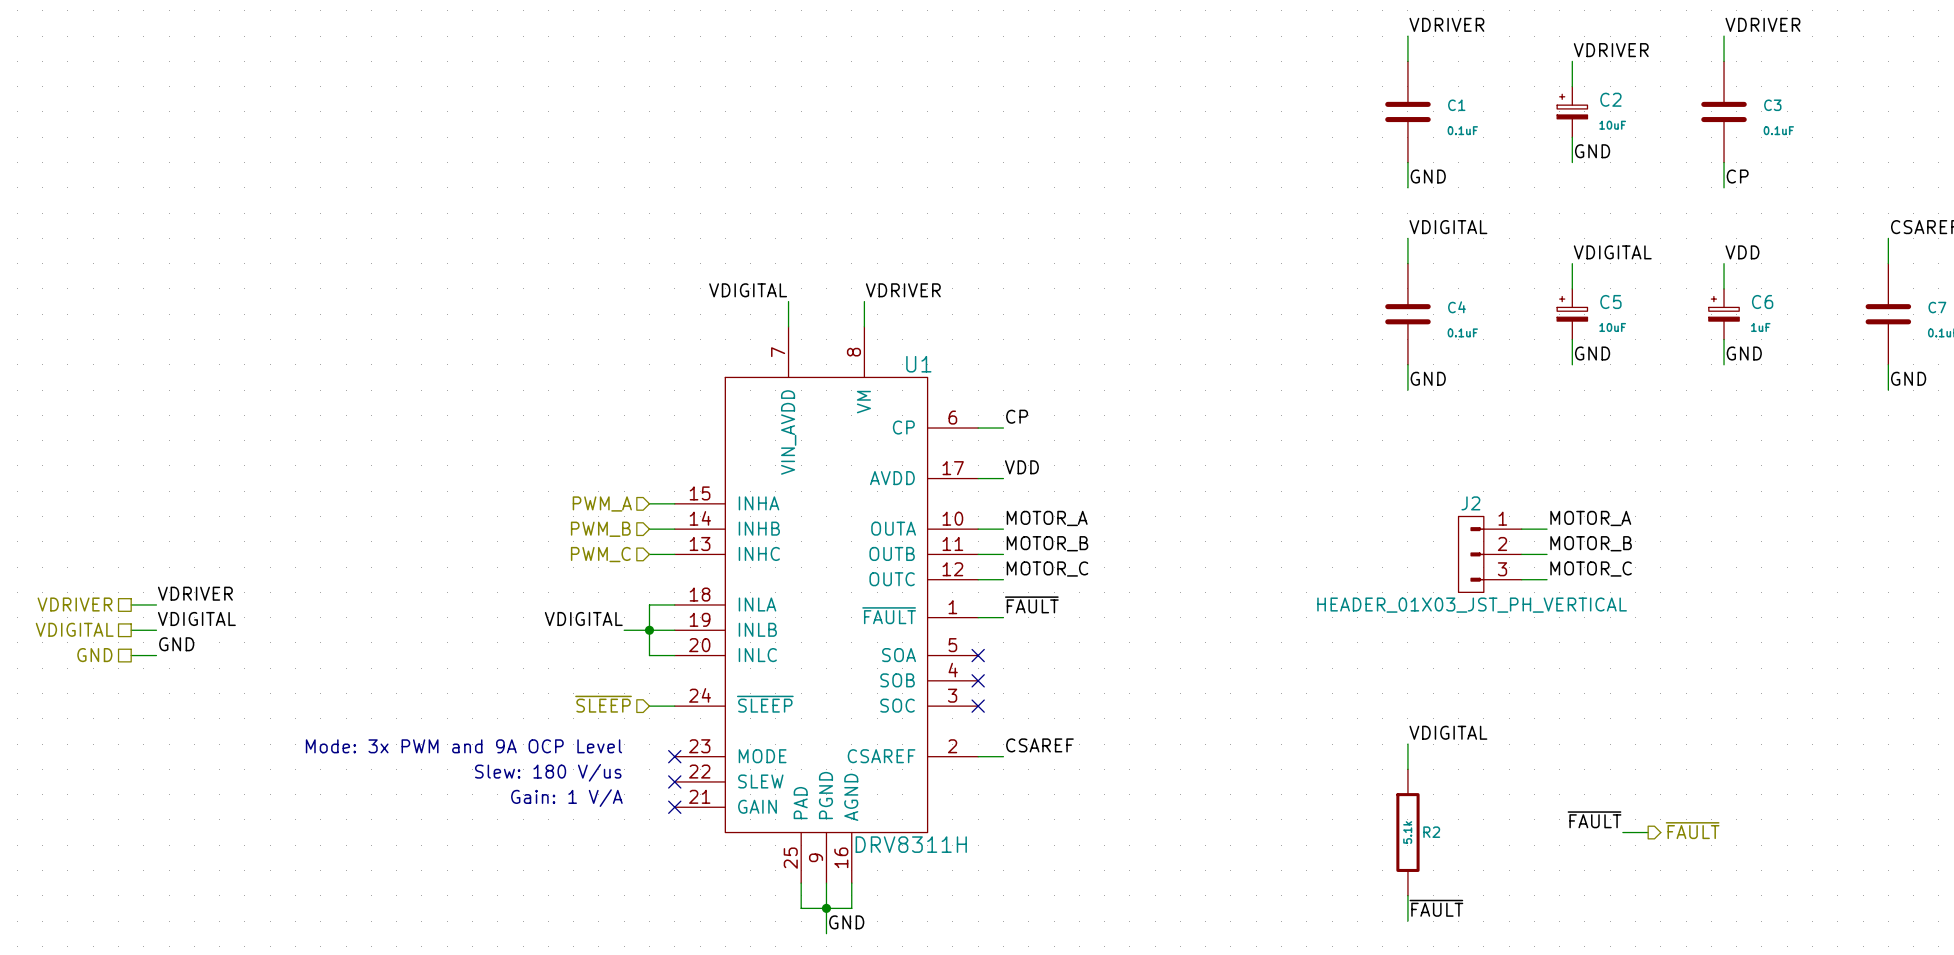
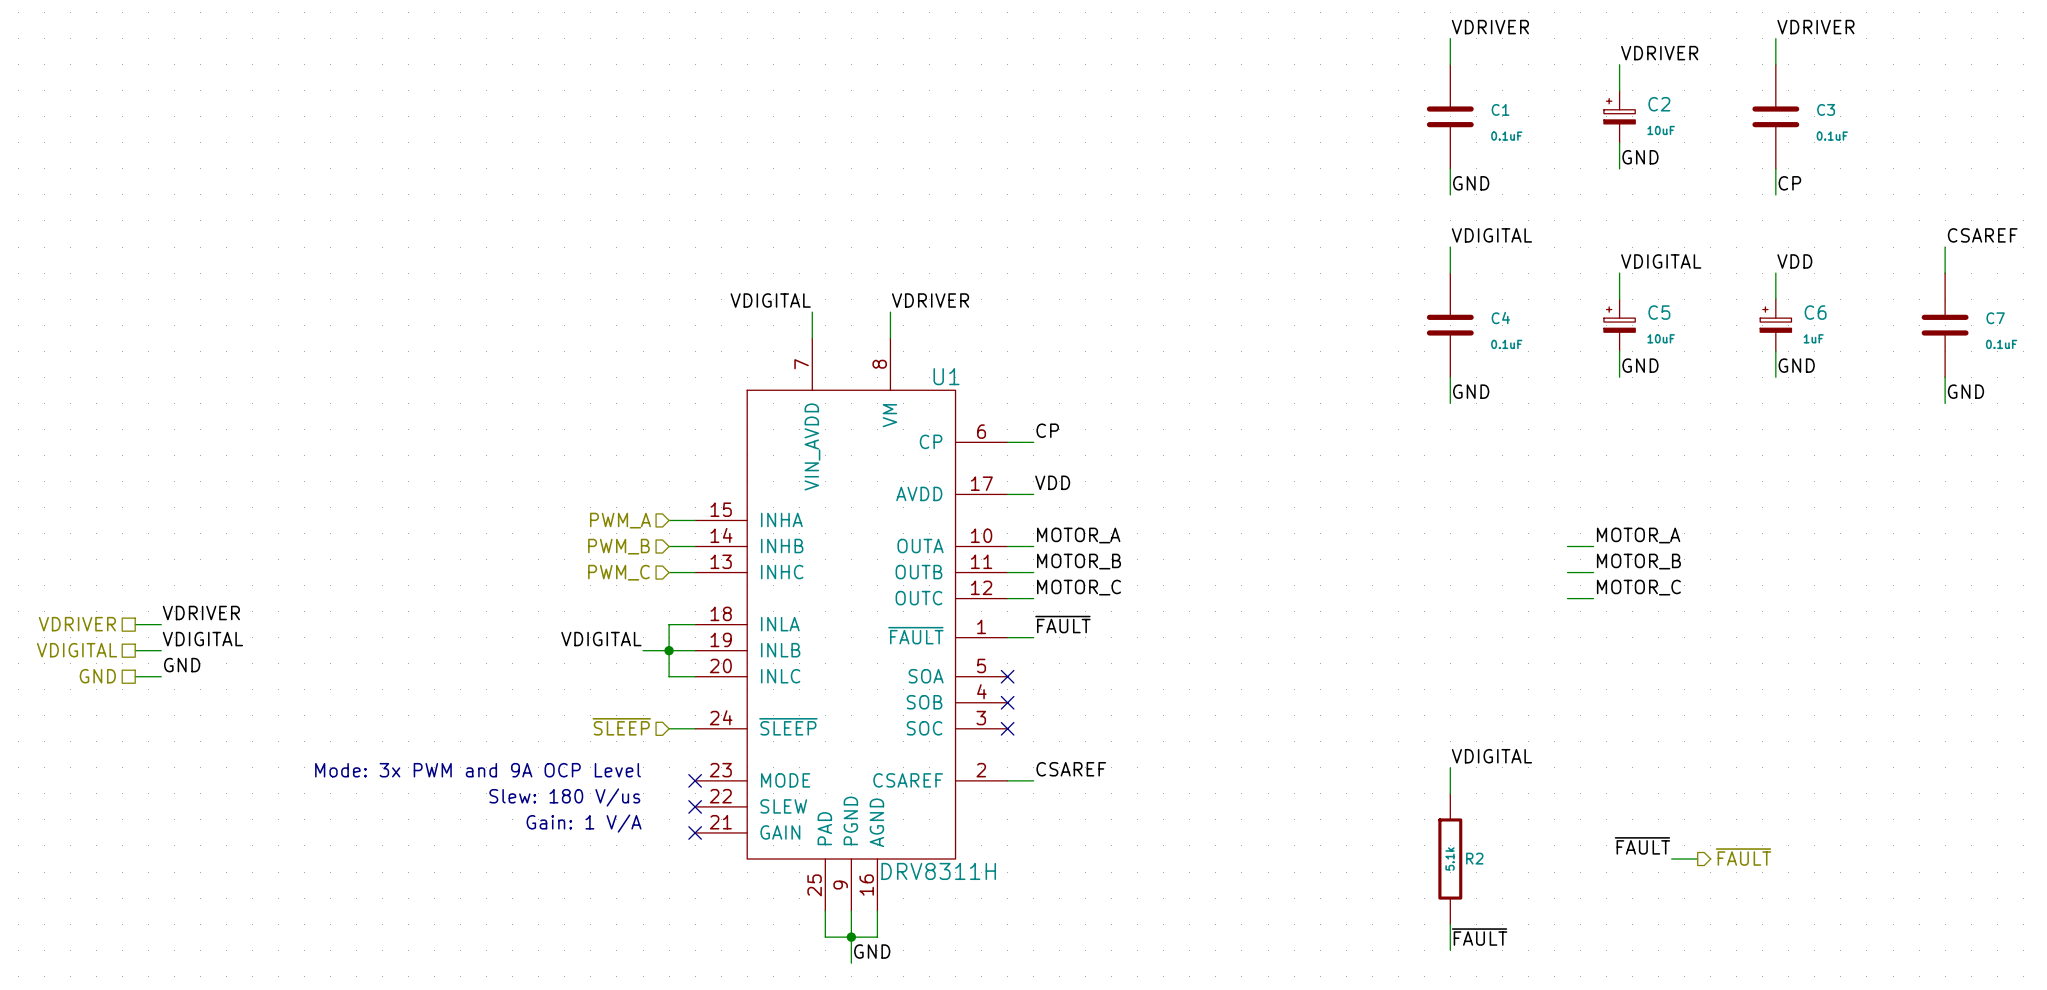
J2: HEADER_01X03_JST_PH_VERTICAL (1490, 554) -> none

